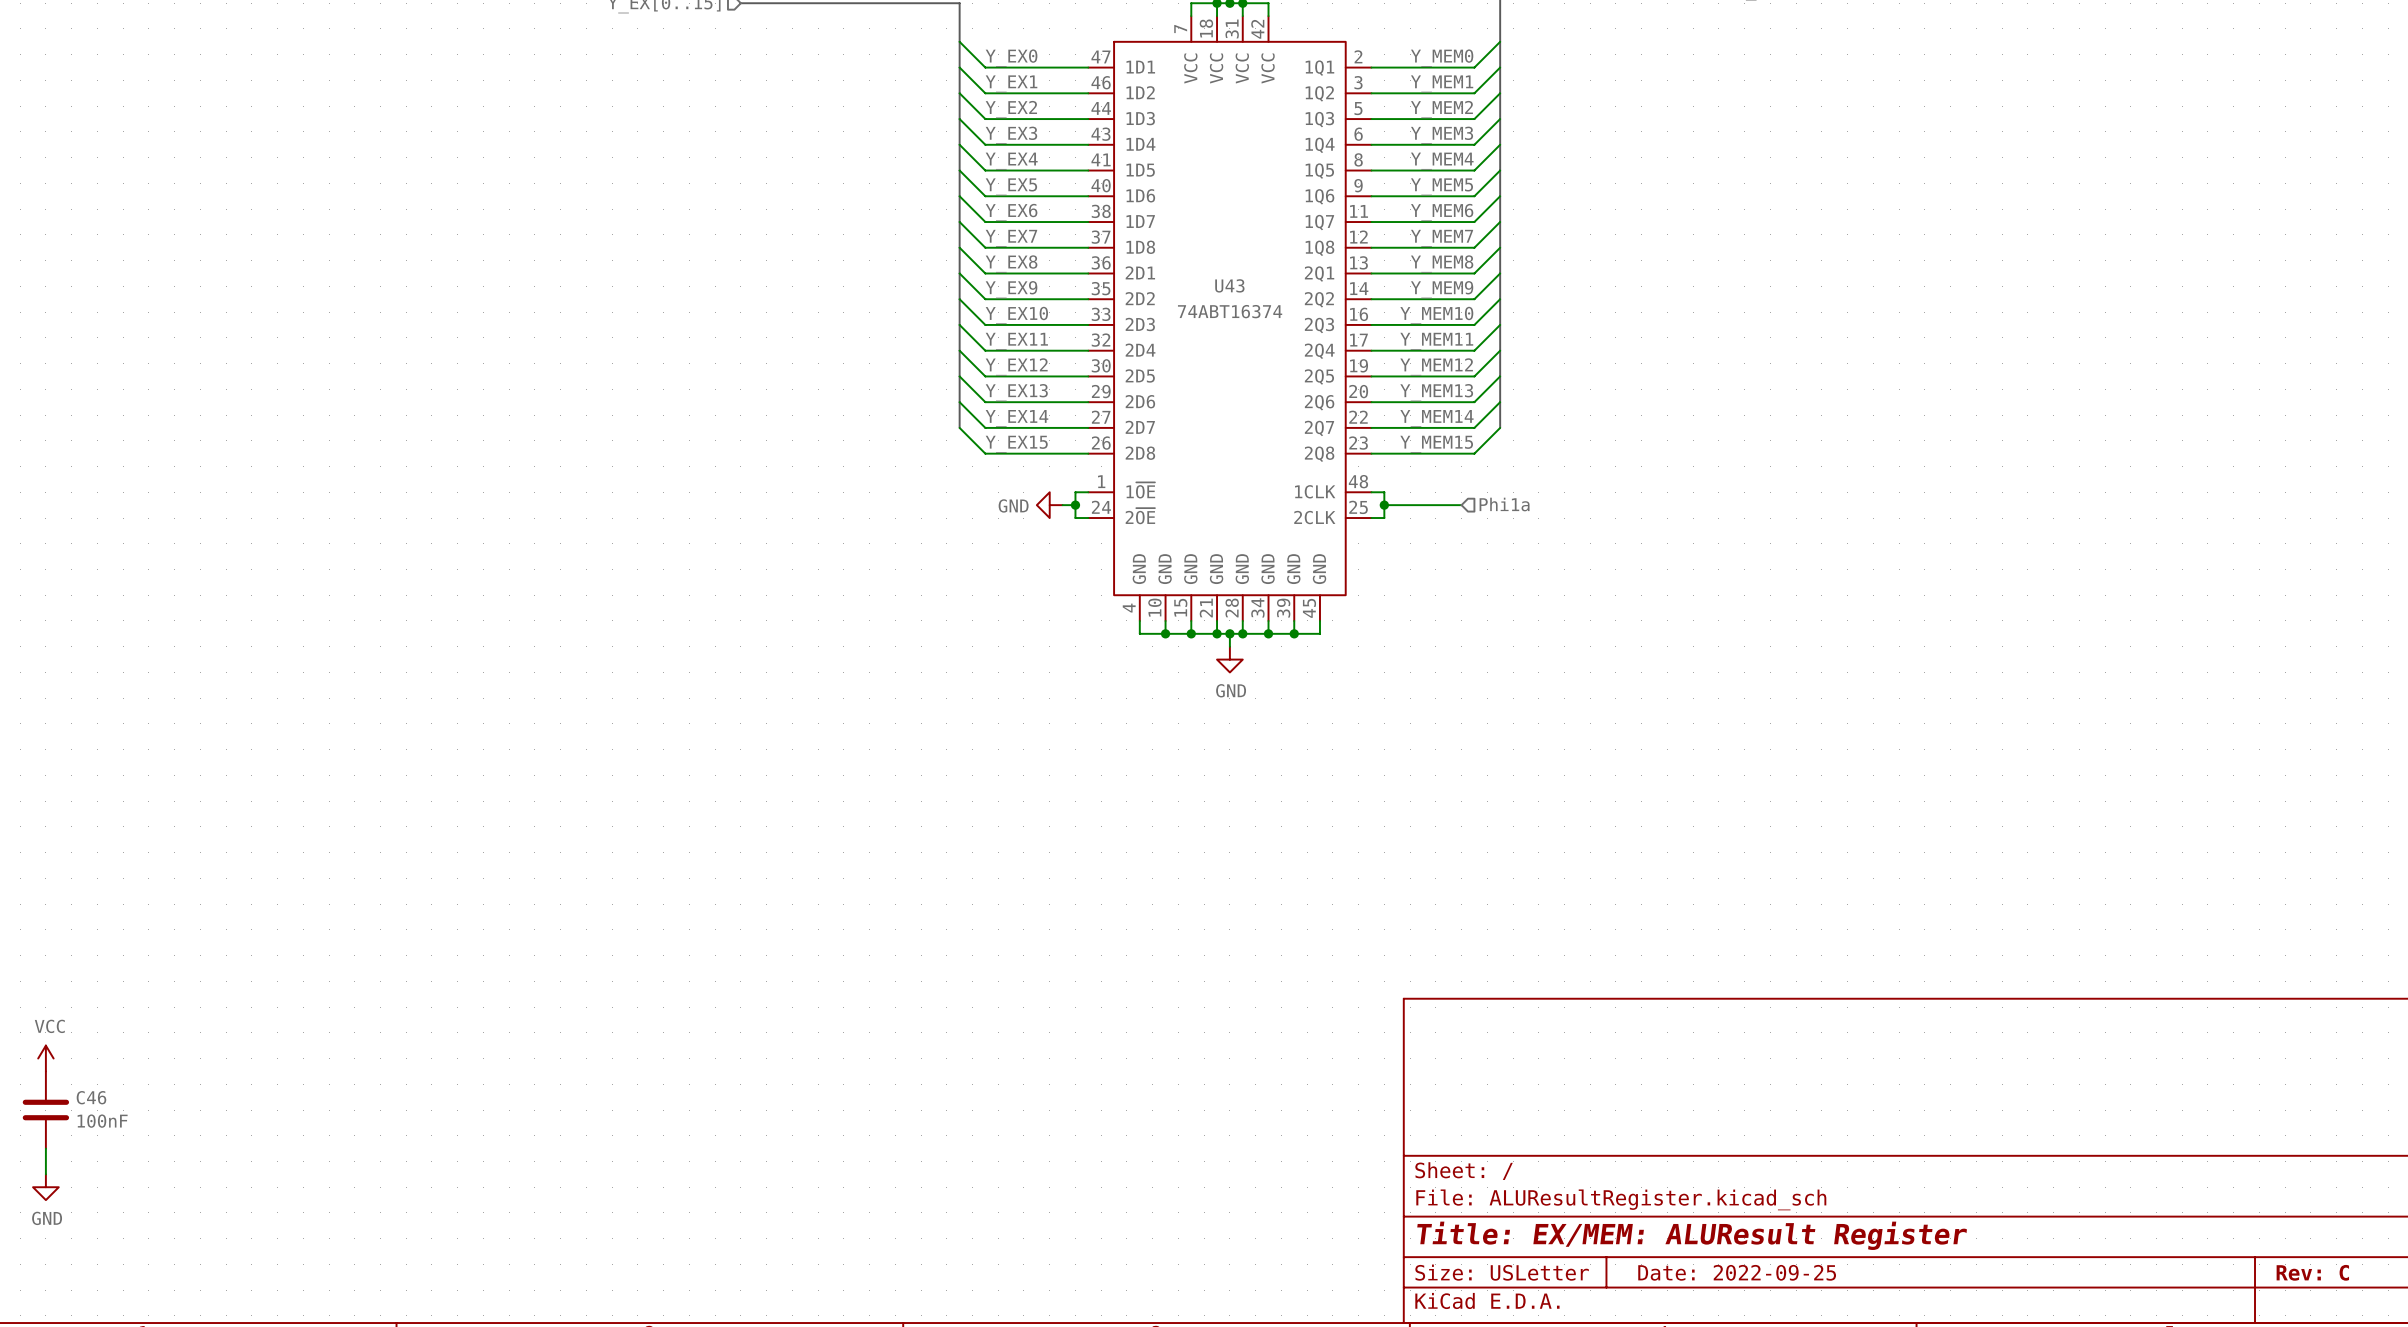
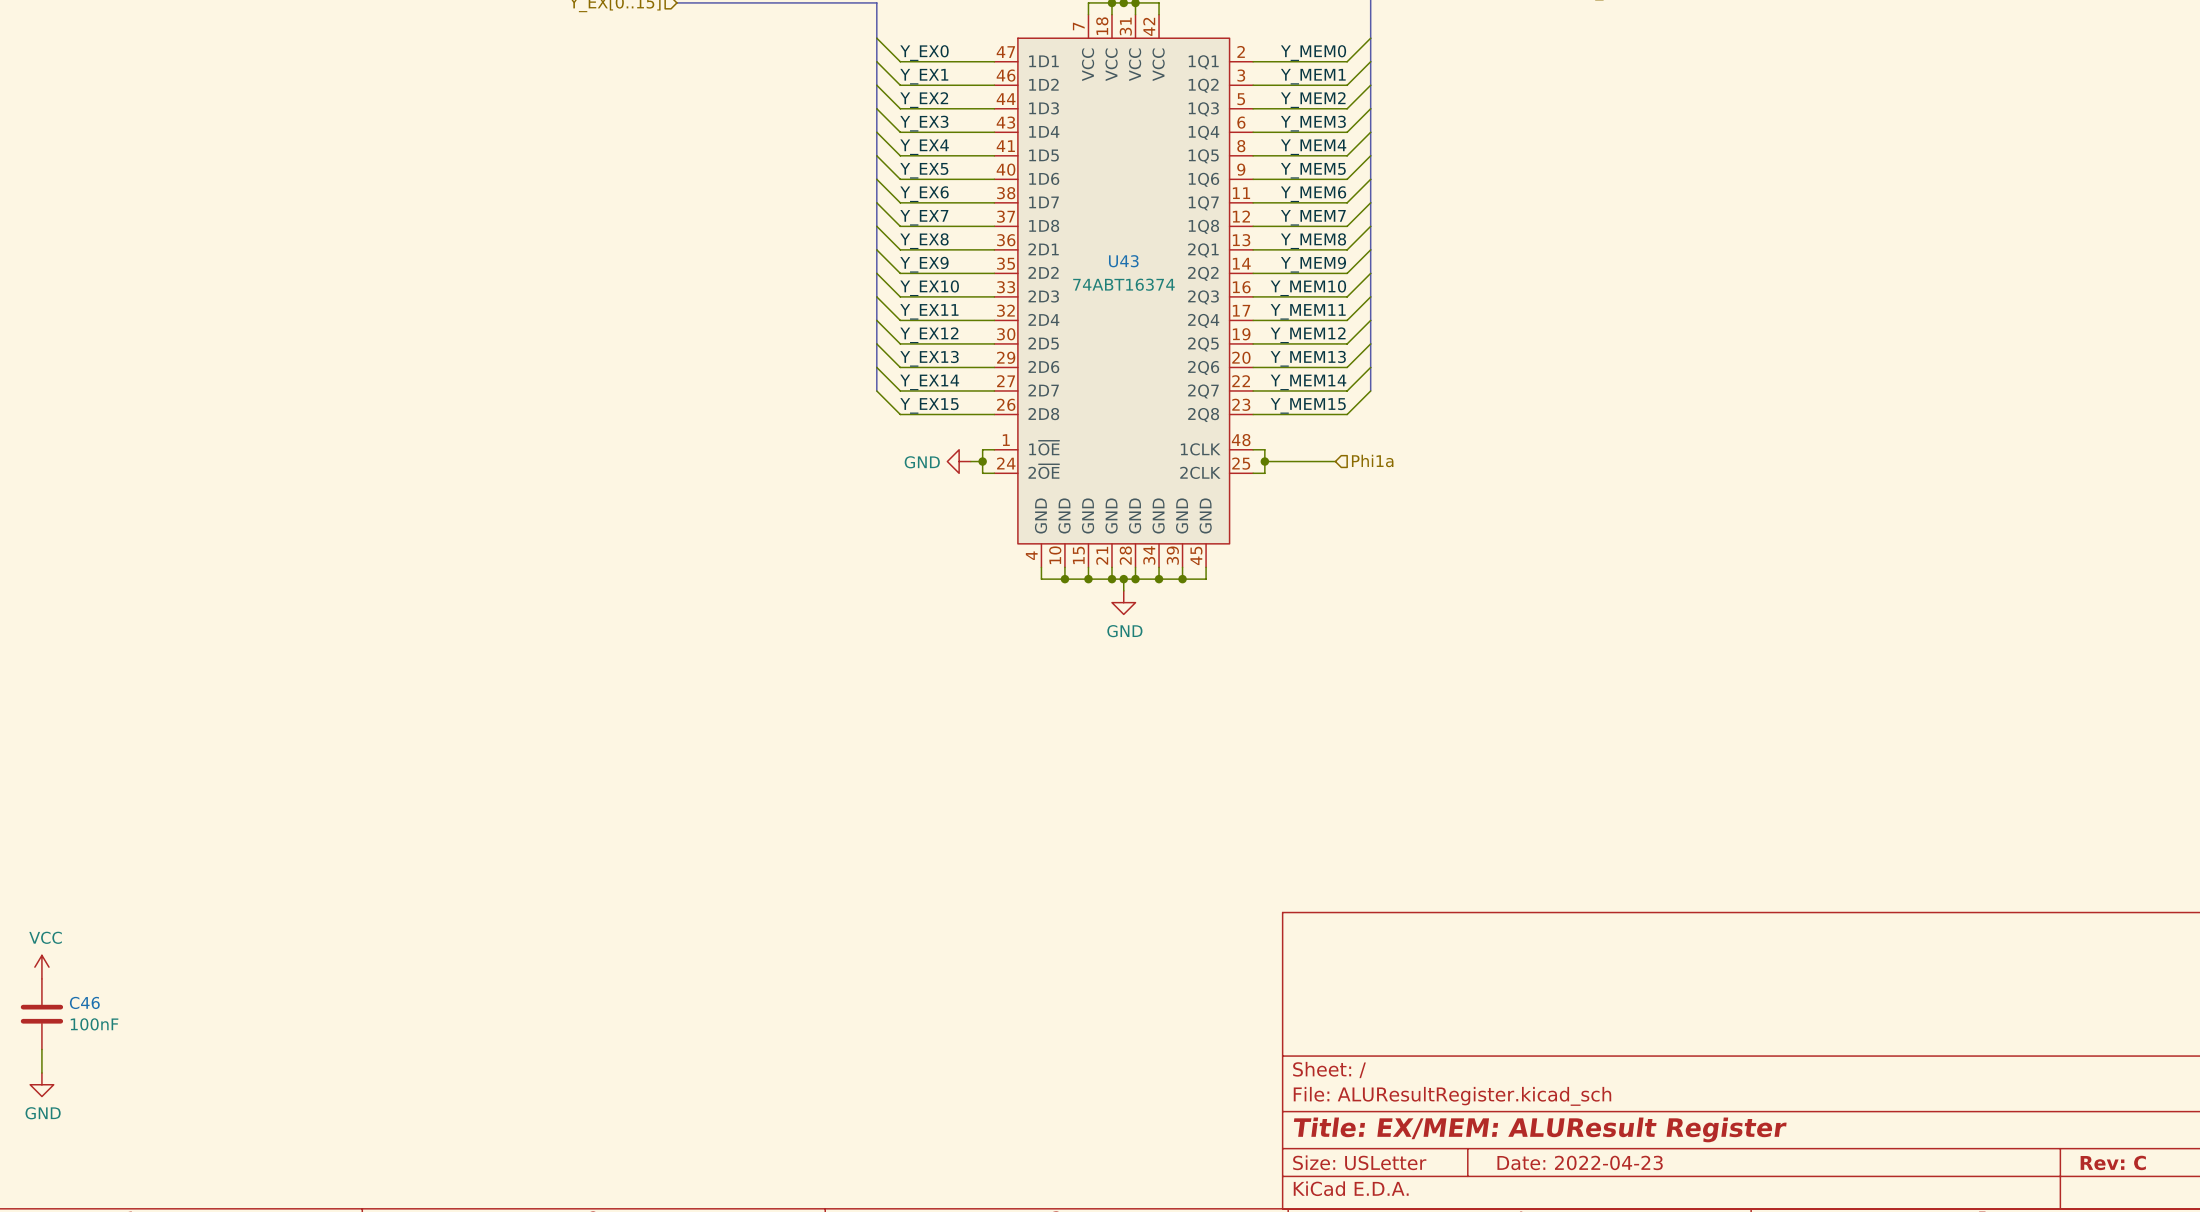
title block: Date: 2022-09-25 (1737, 1272) -> Date: 2022-04-23 (1580, 1162)

